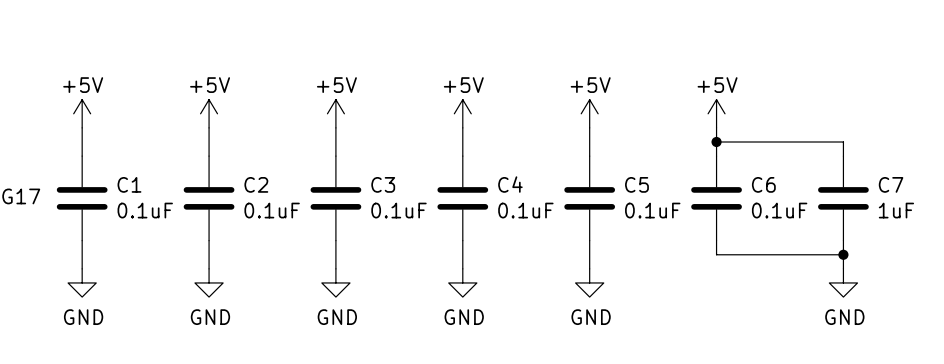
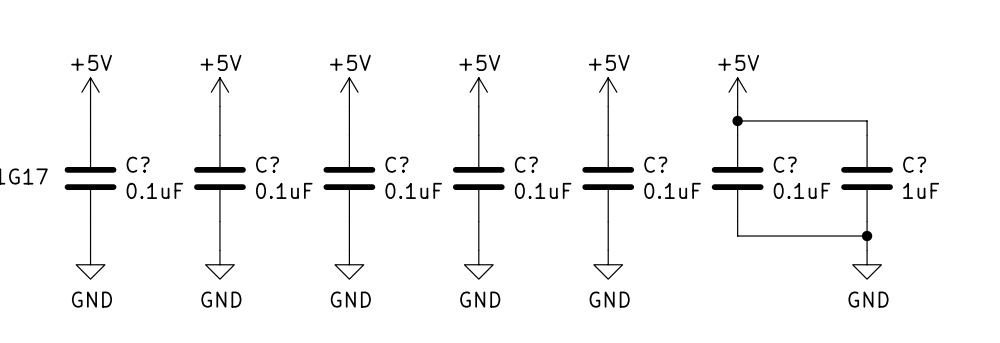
C1 name: C1 (129, 184) -> C? (138, 164)
C2 name: C2 (256, 184) -> C? (267, 164)
C3 name: C3 (383, 184) -> C? (396, 164)
C4 name: C4 (510, 184) -> C? (526, 164)
C5 name: C5 (636, 184) -> C? (655, 164)
C6 name: C6 (763, 184) -> C? (785, 164)
C7 name: C7 (891, 184) -> C? (914, 164)

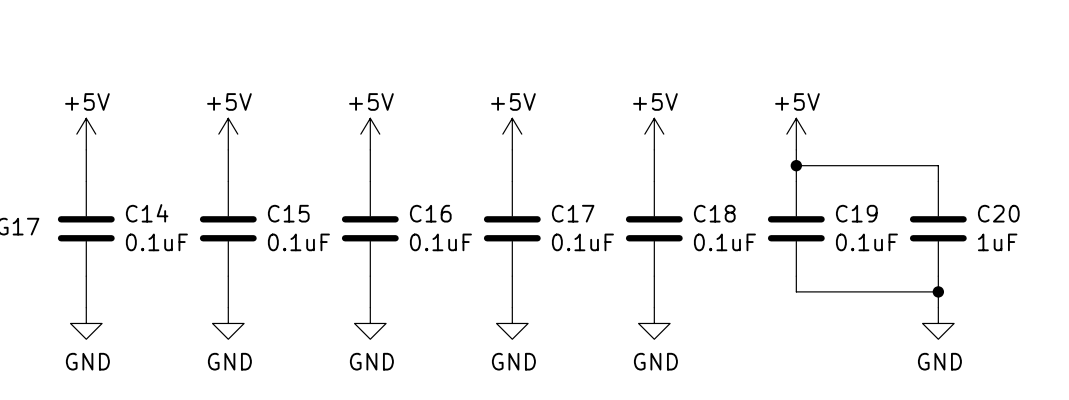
C? name: C? (138, 164) -> C14 (147, 213)
C? name: C? (267, 164) -> C15 (288, 213)
C? name: C? (396, 164) -> C16 (430, 213)
C? name: C? (526, 164) -> C17 (573, 213)
C? name: C? (655, 164) -> C18 (714, 213)
C? name: C? (785, 164) -> C19 (856, 213)
C? name: C? (914, 164) -> C20 (998, 213)

